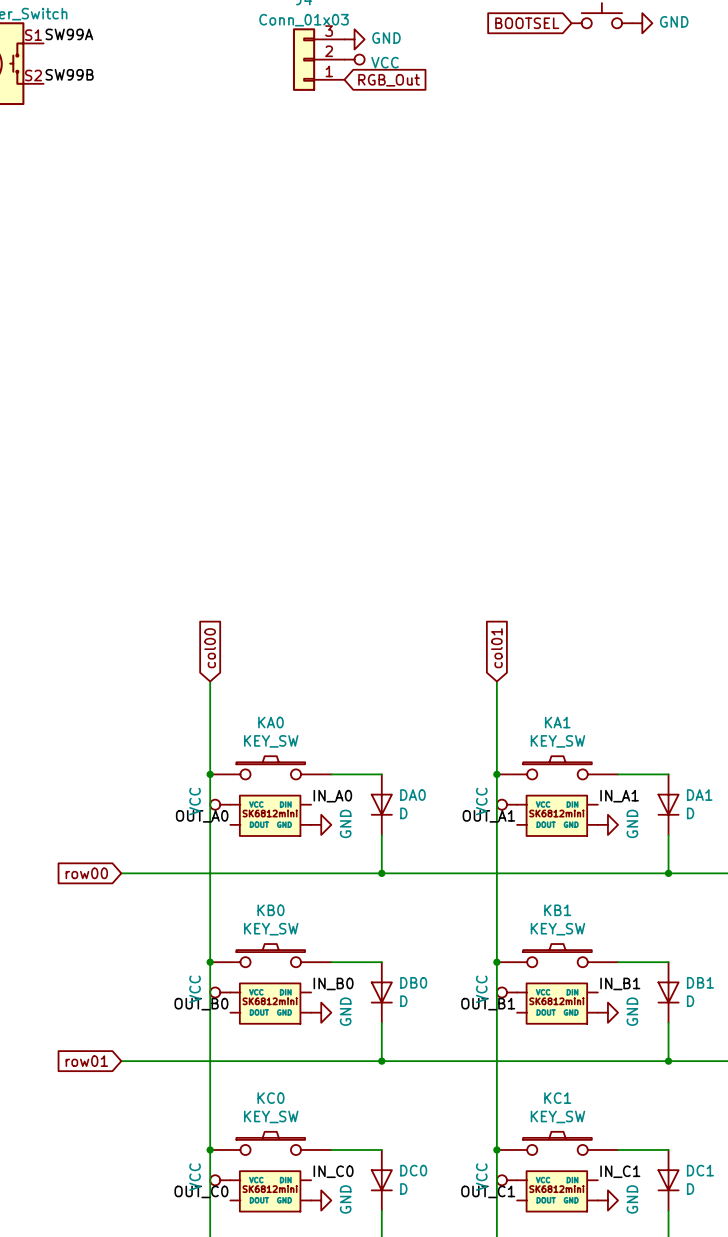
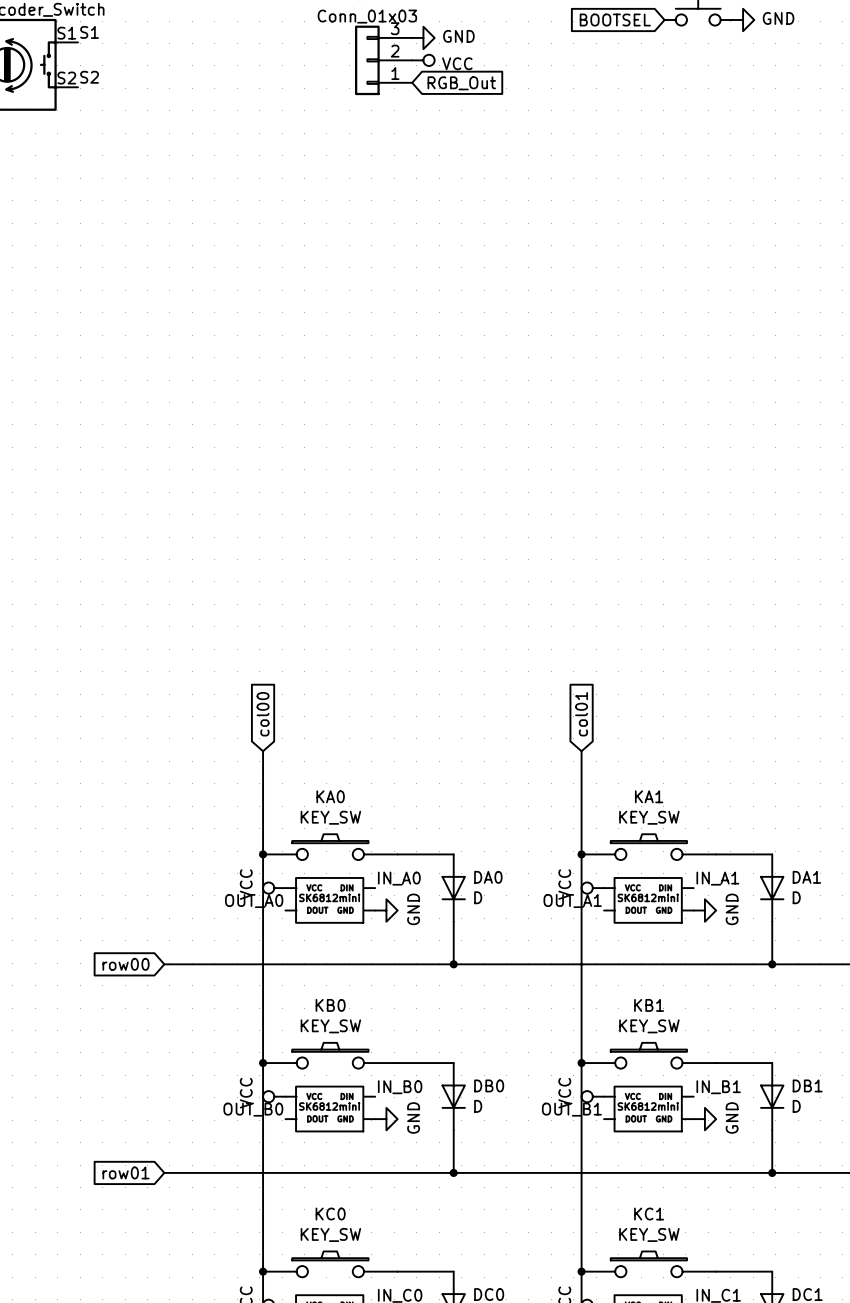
label: SW99A (69, 34) -> S1 (89, 32)
label: SW99B (69, 74) -> S2 (89, 77)

